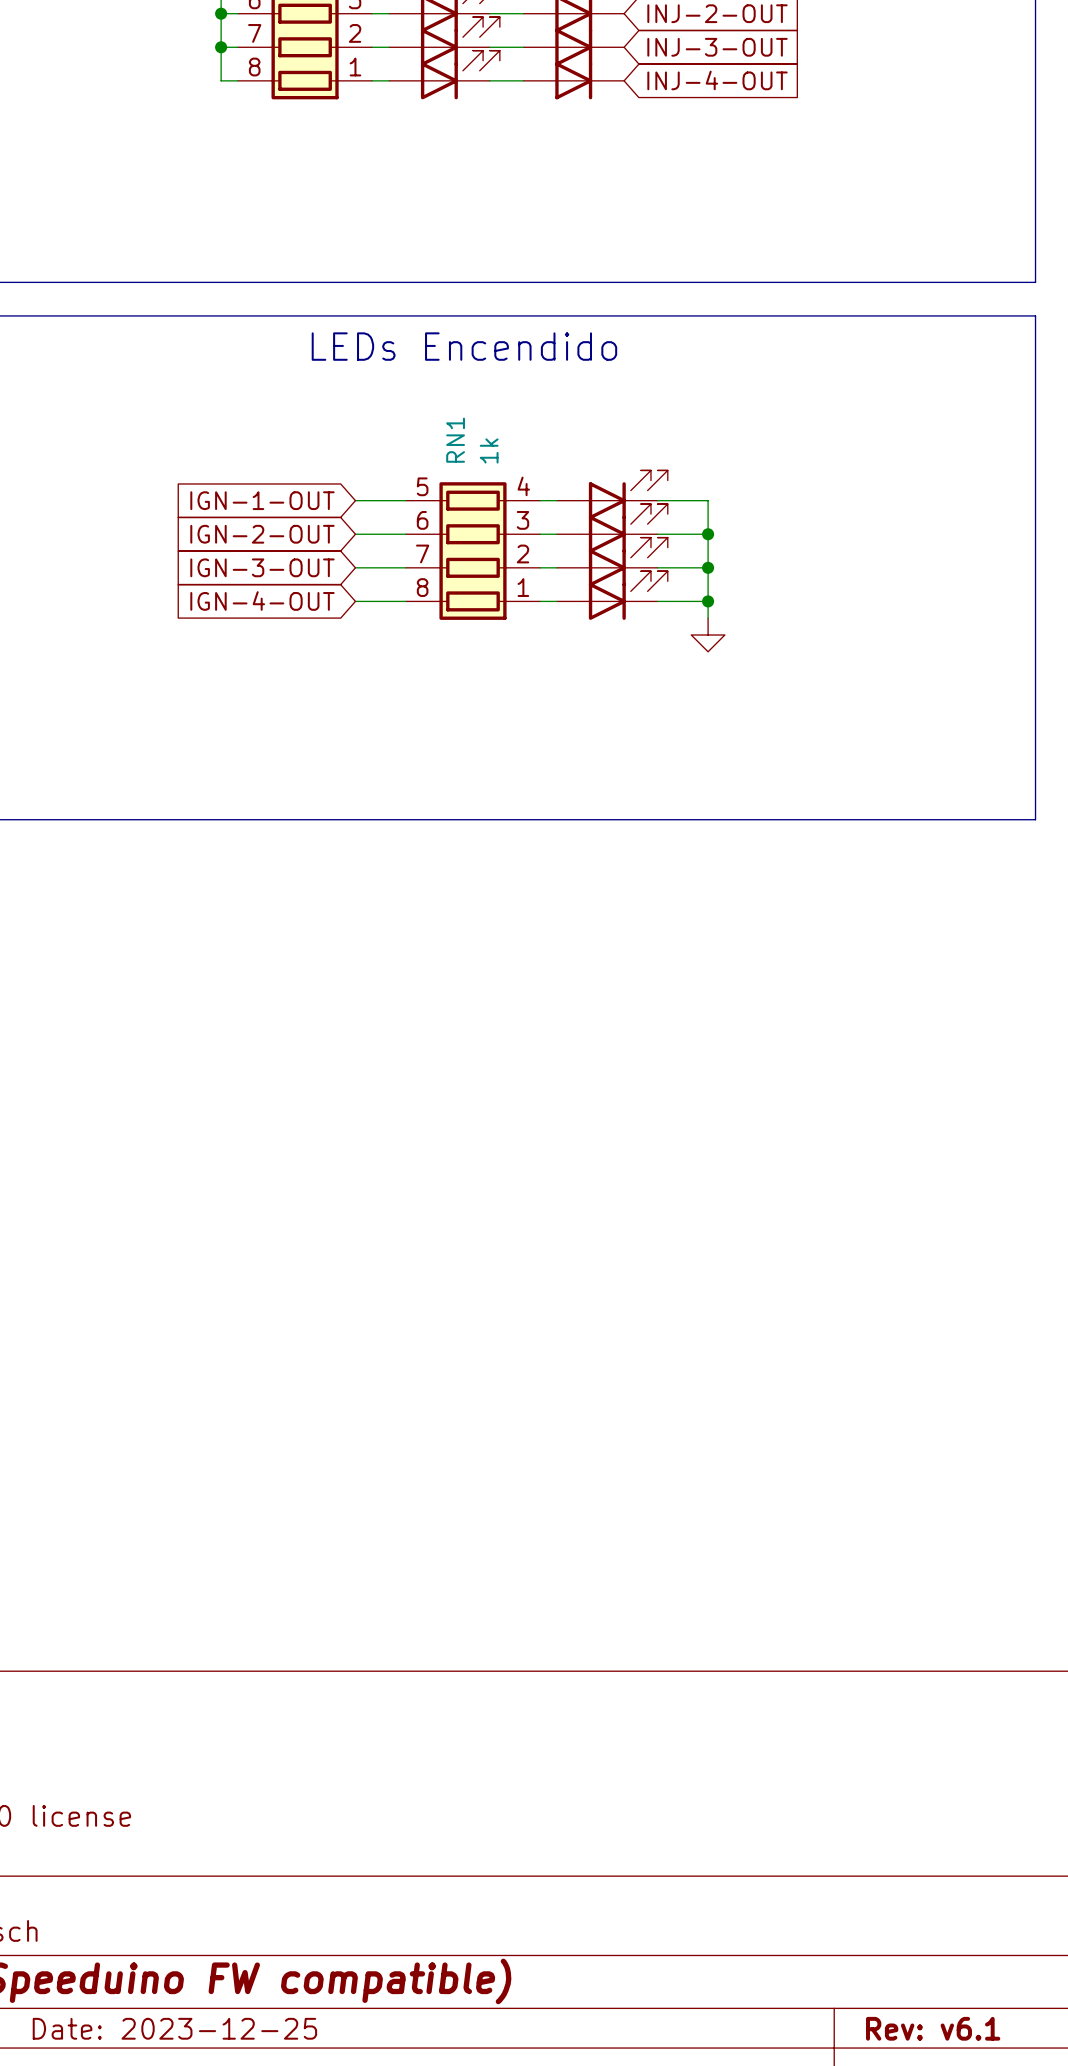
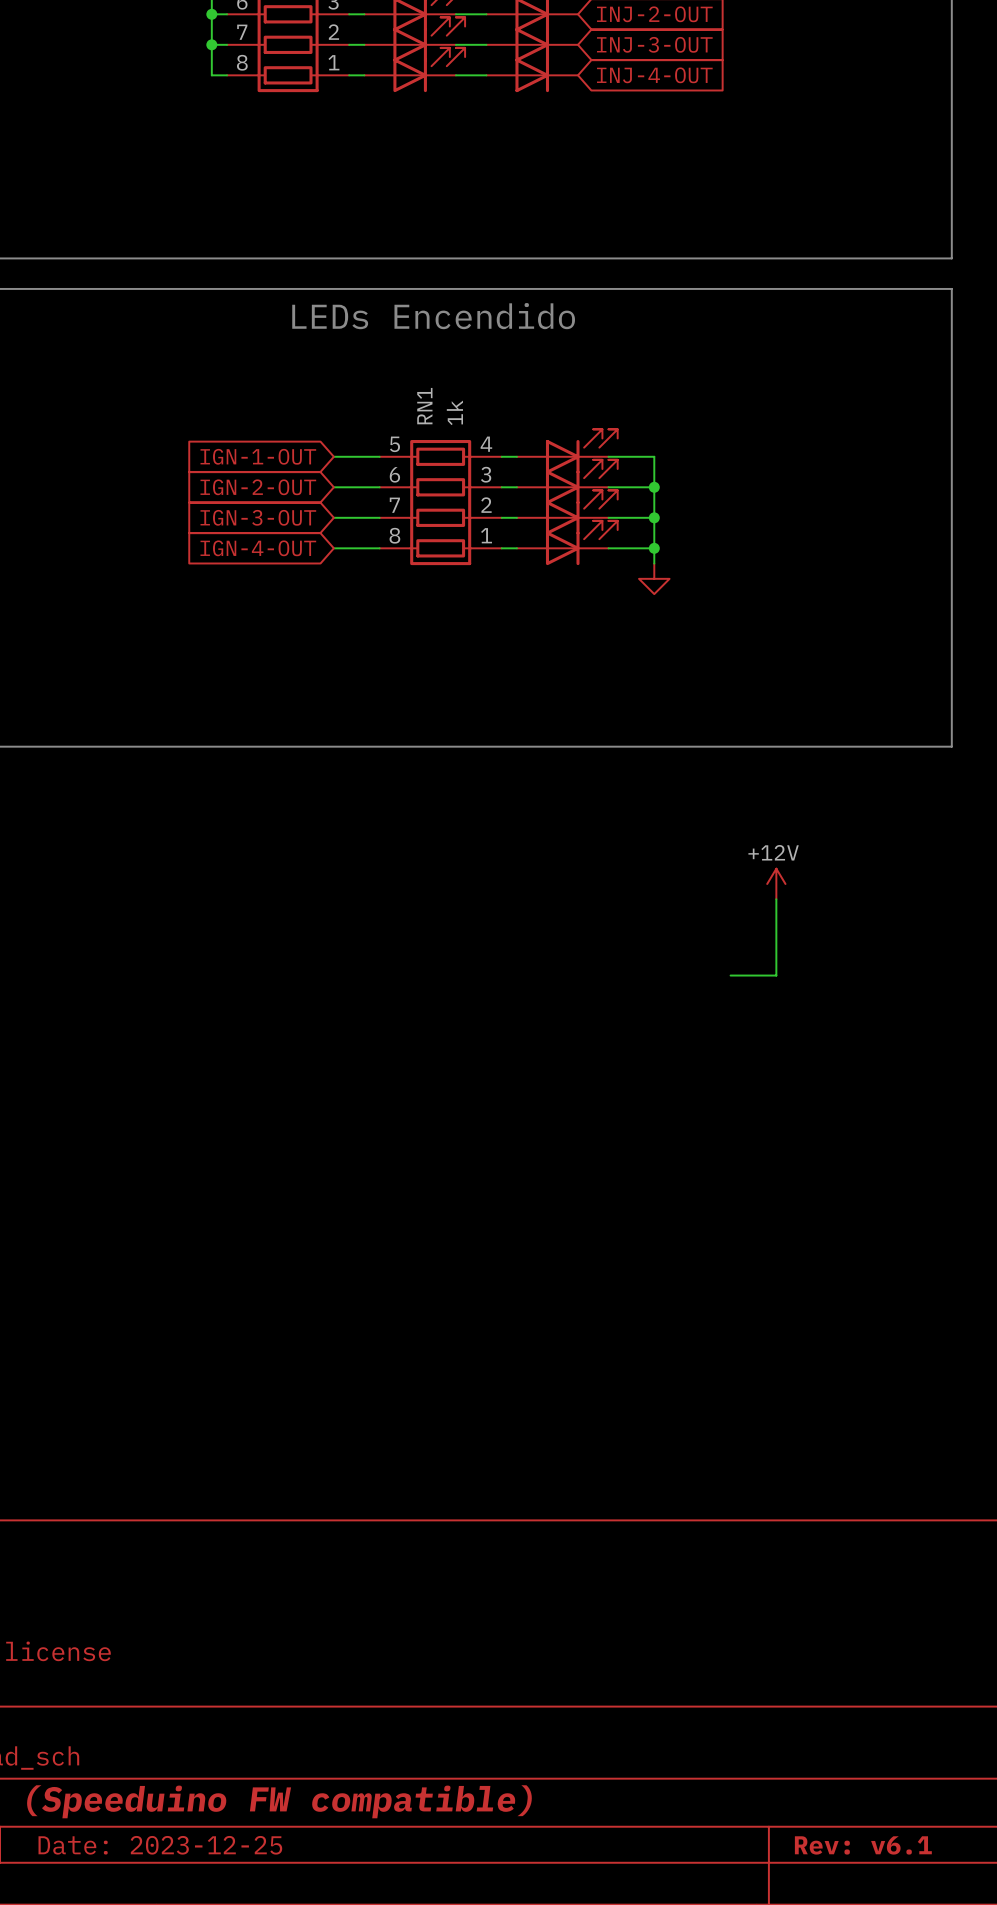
power symbol: none -> +12V (776, 884)
wire: none -> (776, 899) (776, 975) (730, 975)

